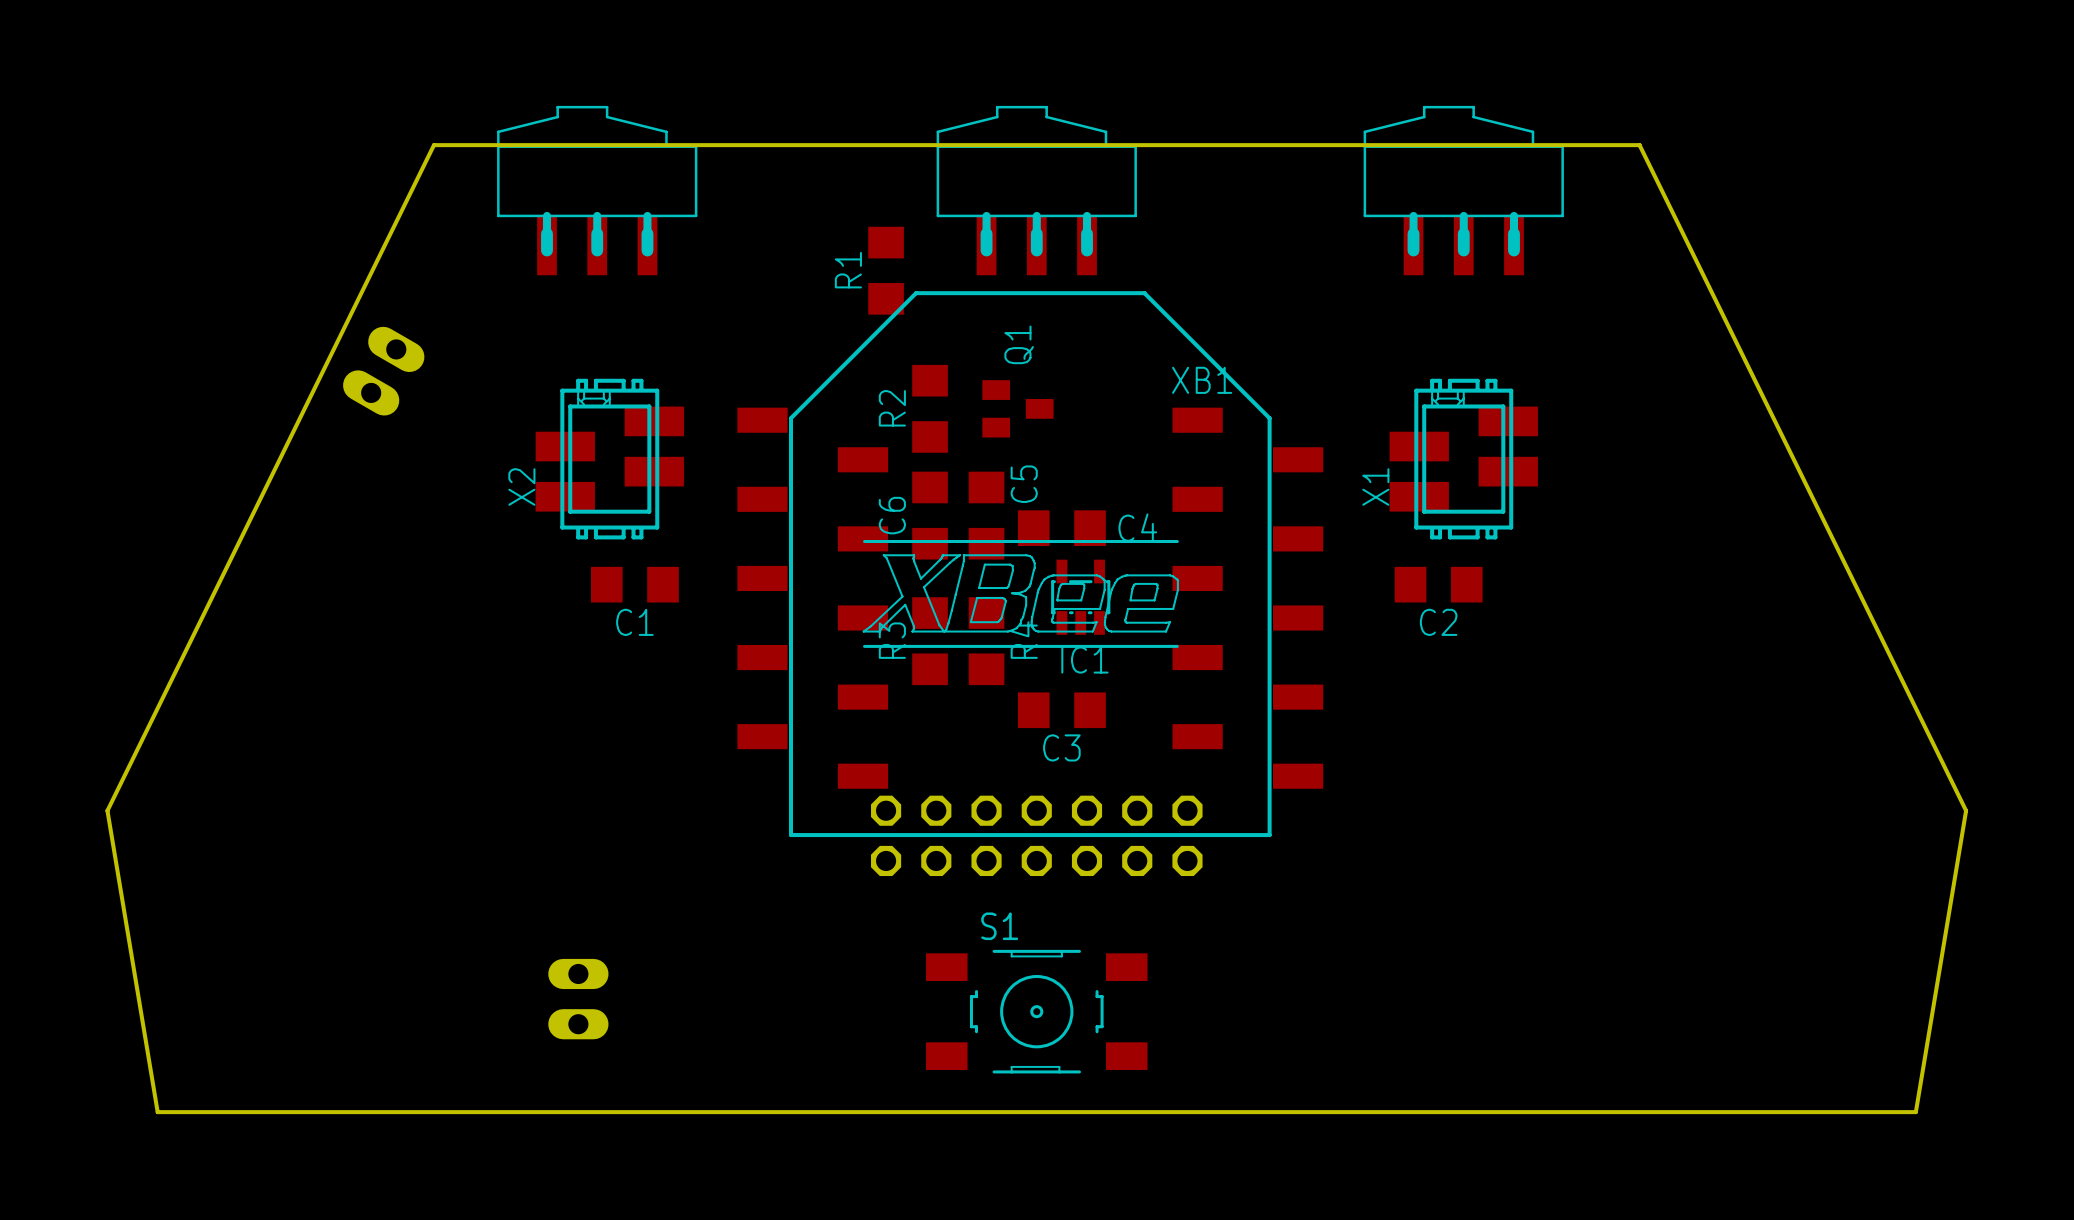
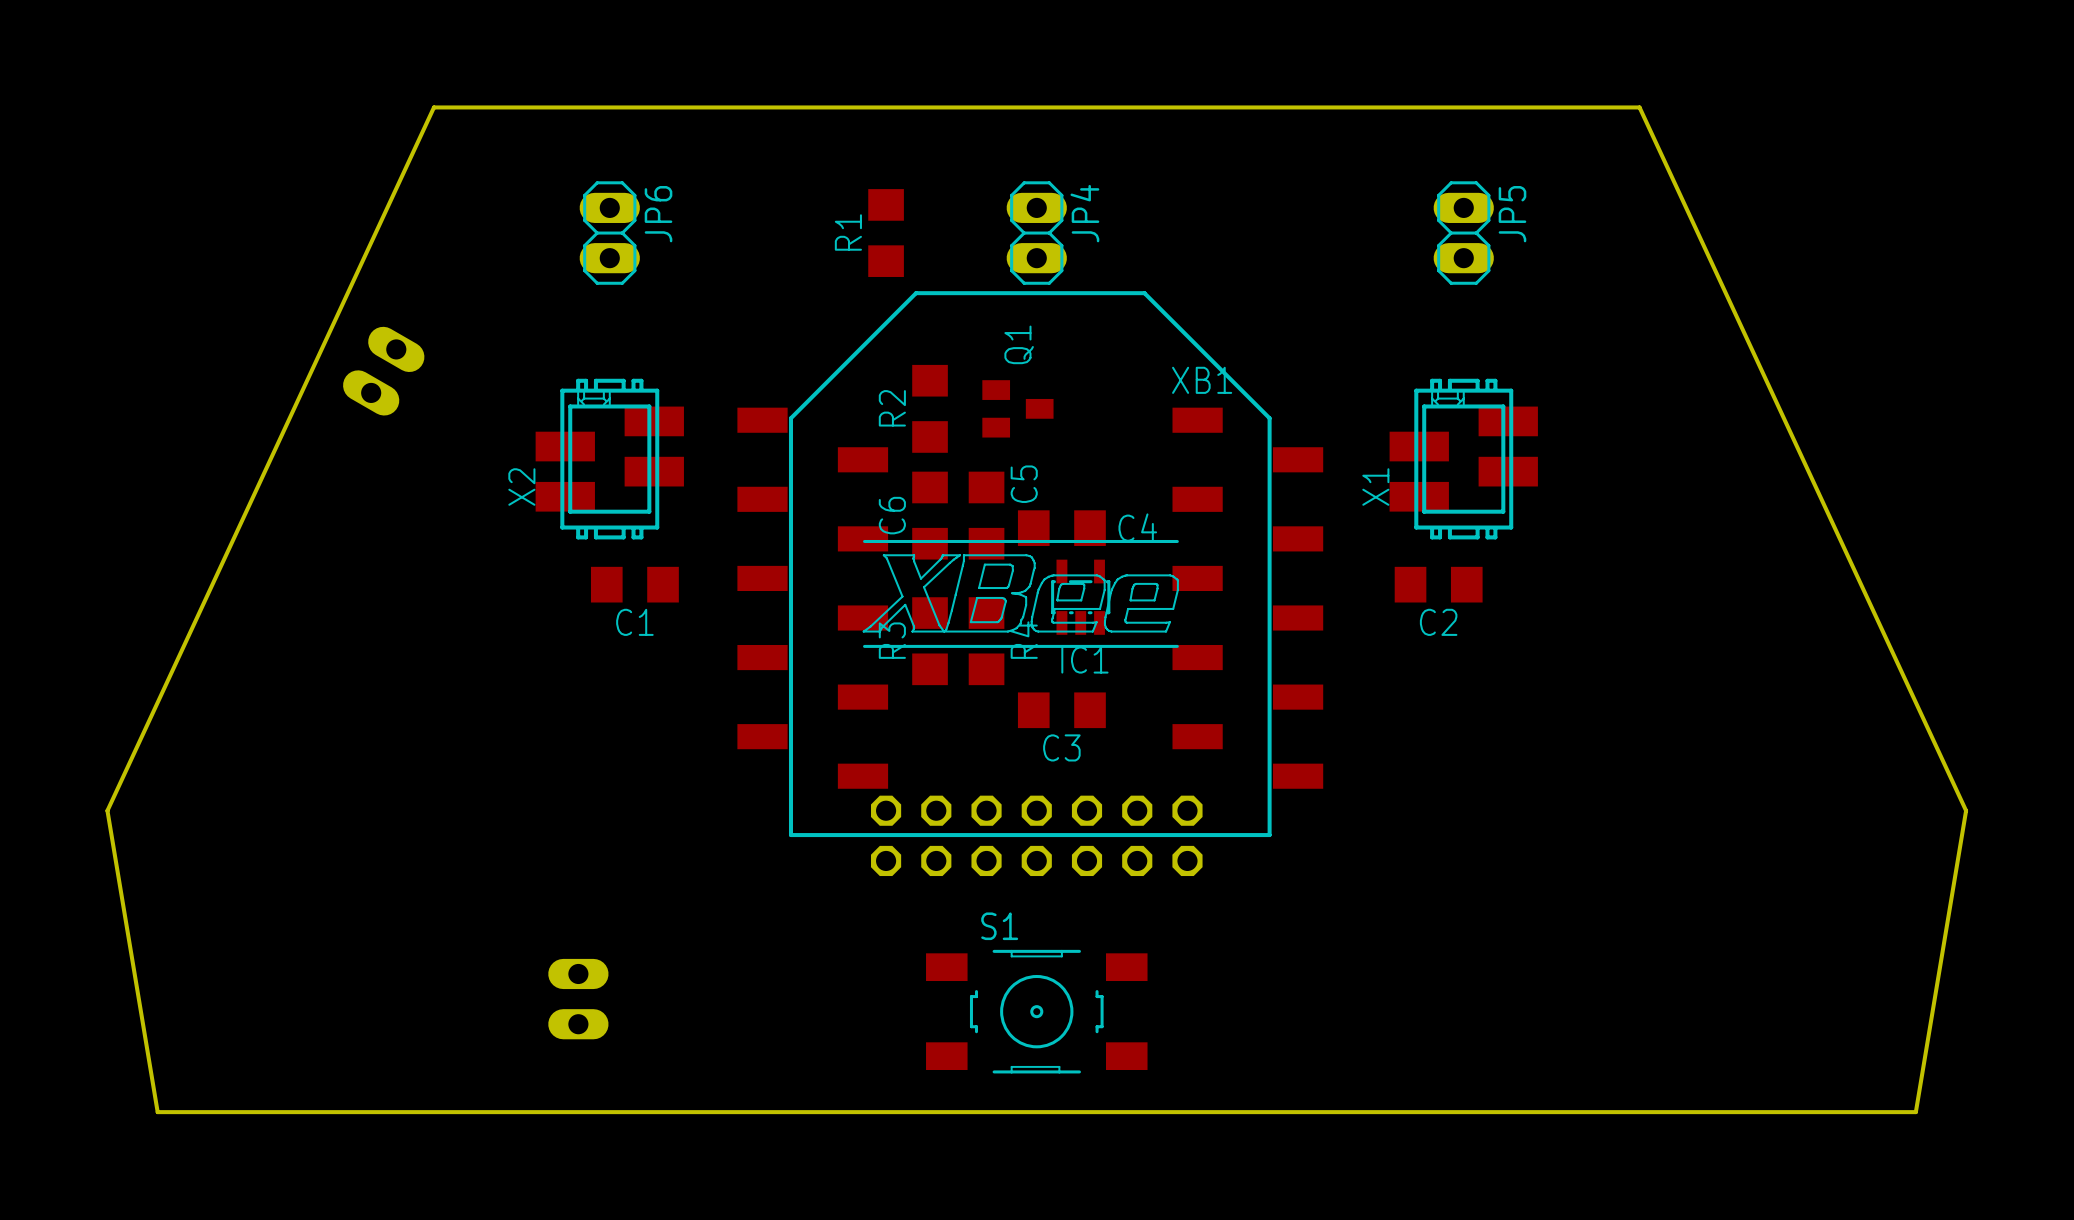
part: (597, 190) -> none
part: (1036, 190) -> none
part: (1463, 190) -> none
JP6: none -> (609, 233)
JP4: none -> (1036, 233)
JP5: none -> (1463, 233)
R1 position: (886, 270) -> (886, 233)
board edge: (107, 810) (433, 145) (1639, 145) (1966, 810) -> (107, 810) (433, 107) (1639, 107) (1966, 810)

